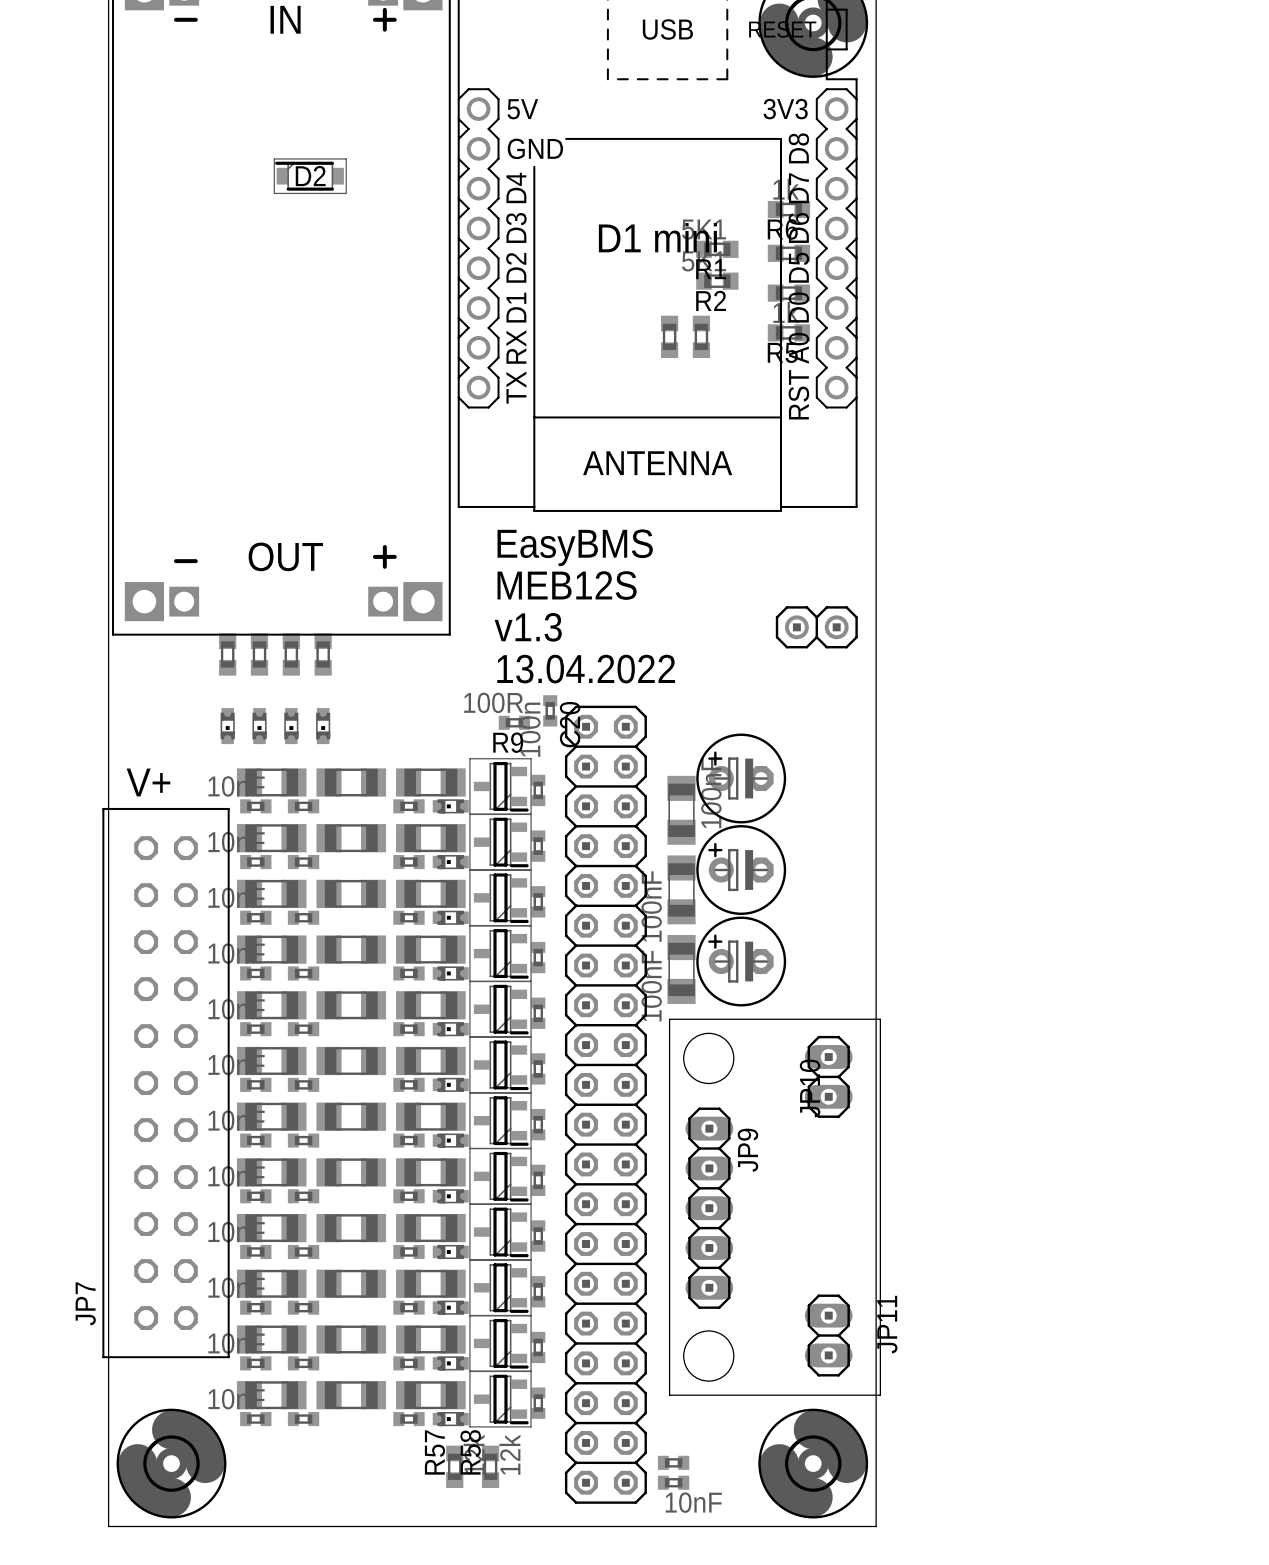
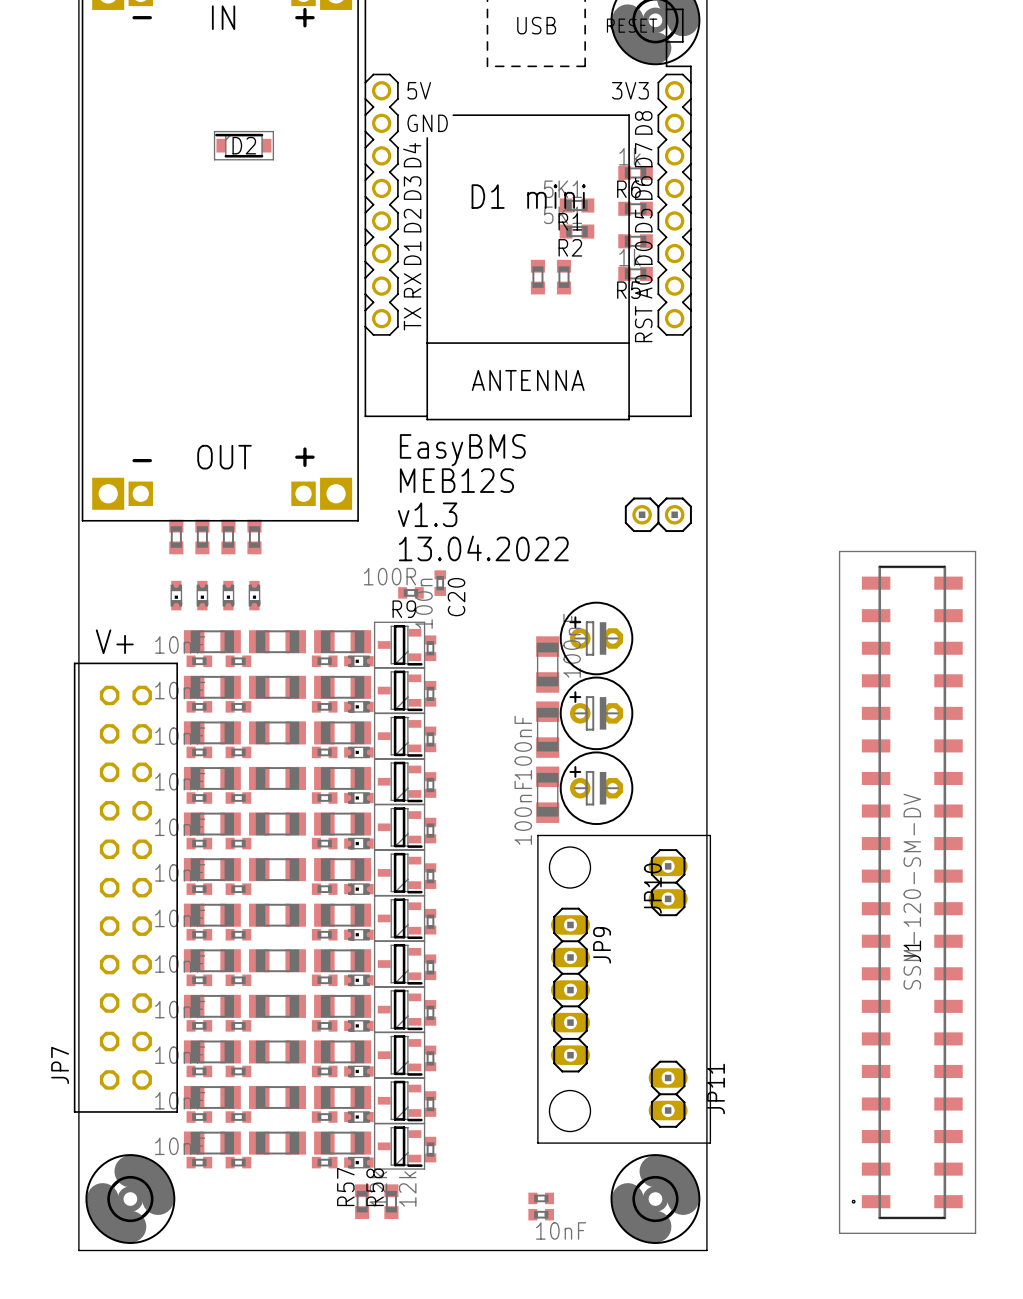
J1: none -> SSM-120-SM-DV (907, 892)
part: (605, 1104) -> none

